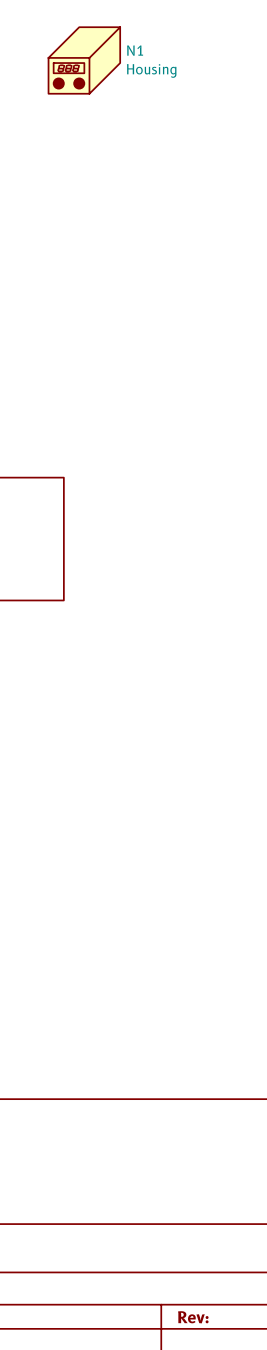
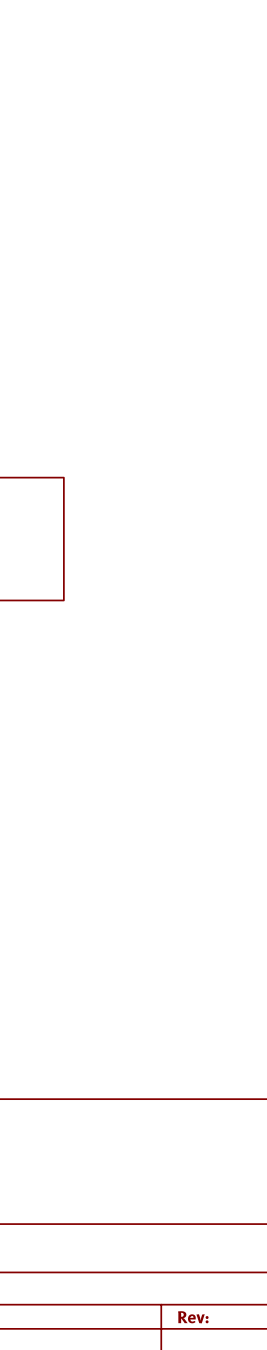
N1: Housing (84, 60) -> none

